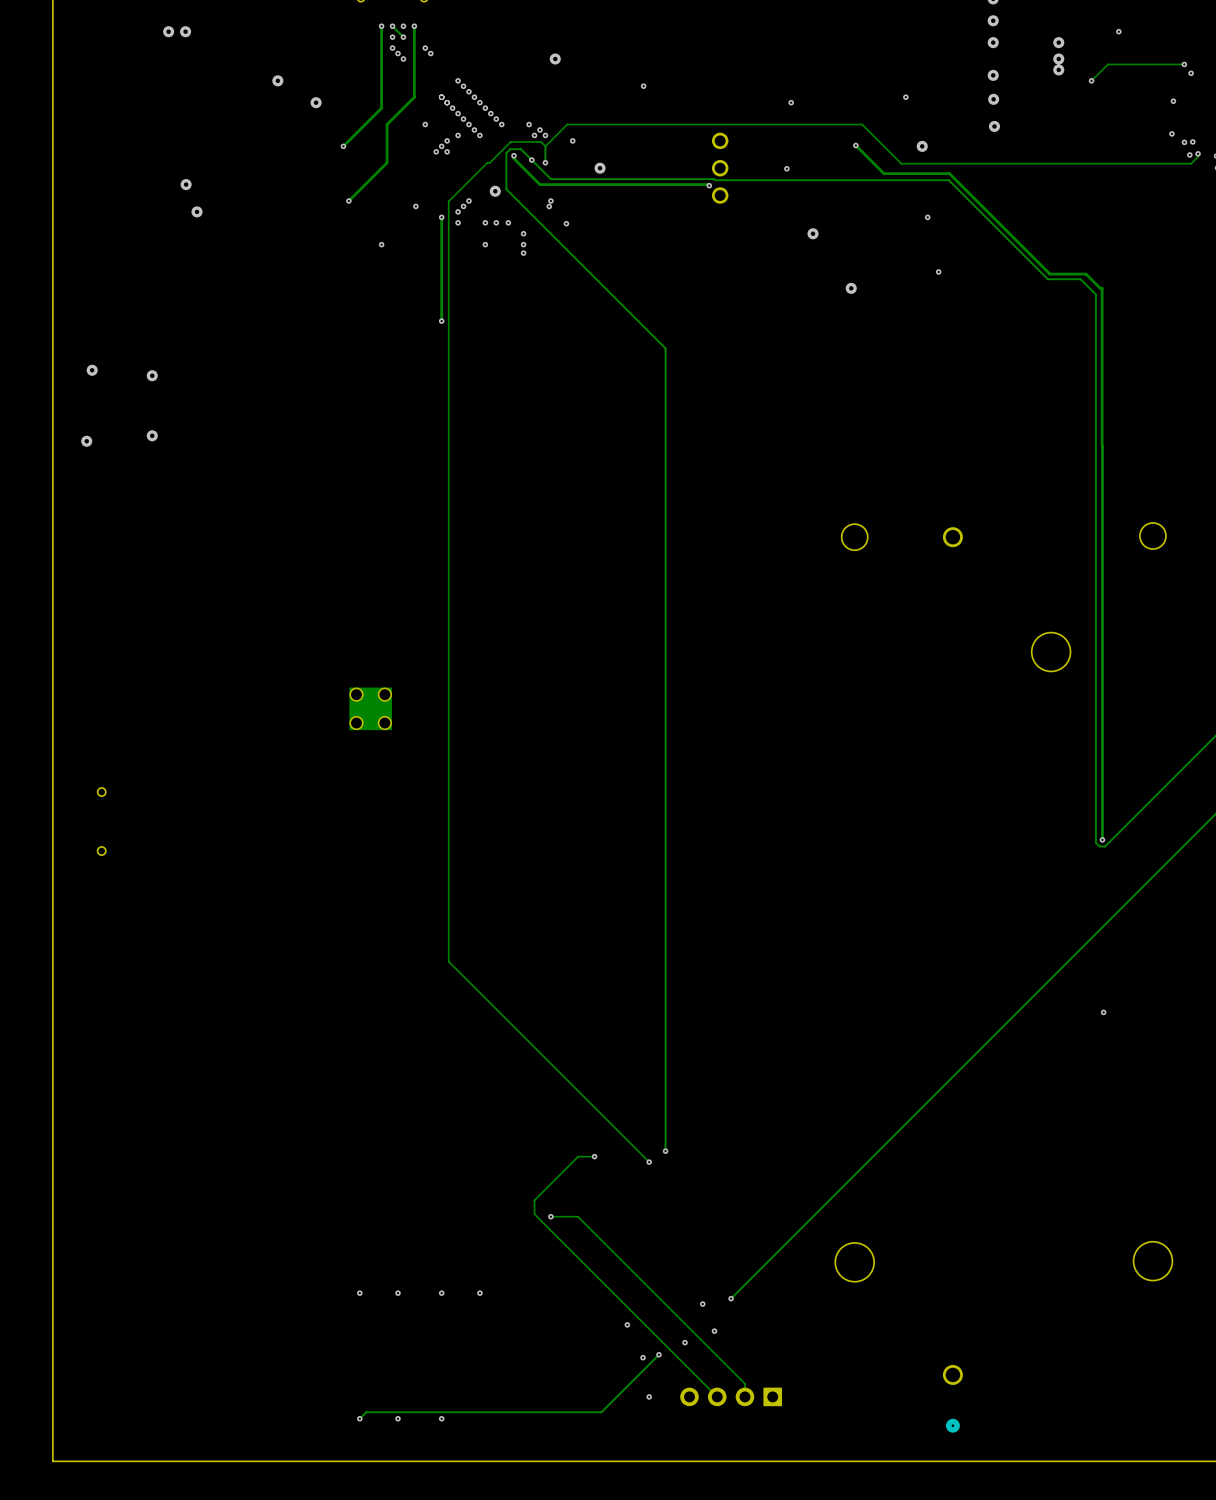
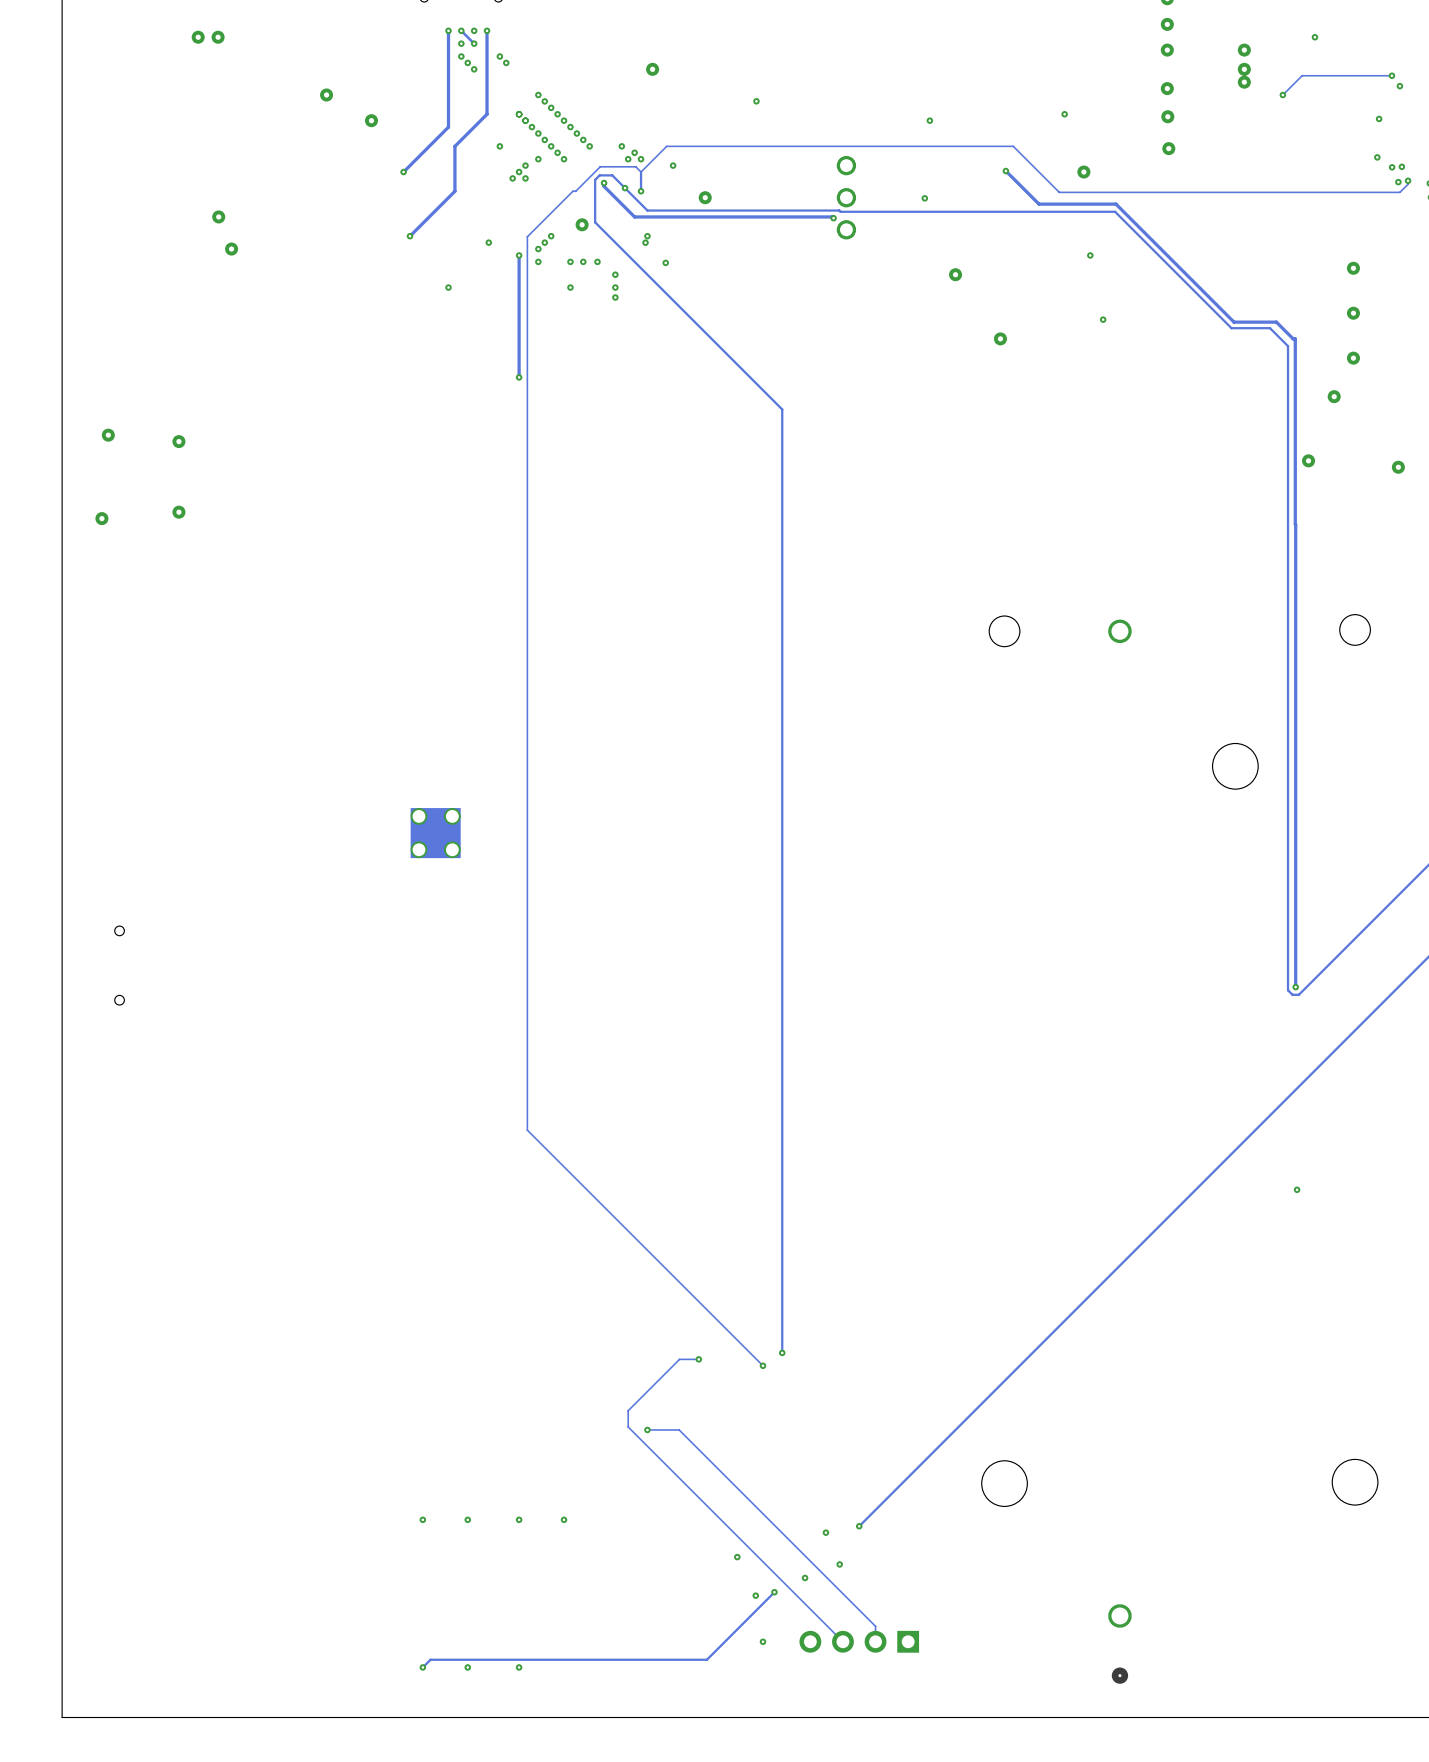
via: none -> (1353, 268)
via: none -> (1353, 313)
via: none -> (1353, 358)
via: none -> (1334, 396)
via: none -> (1308, 460)
via: none -> (1398, 467)

